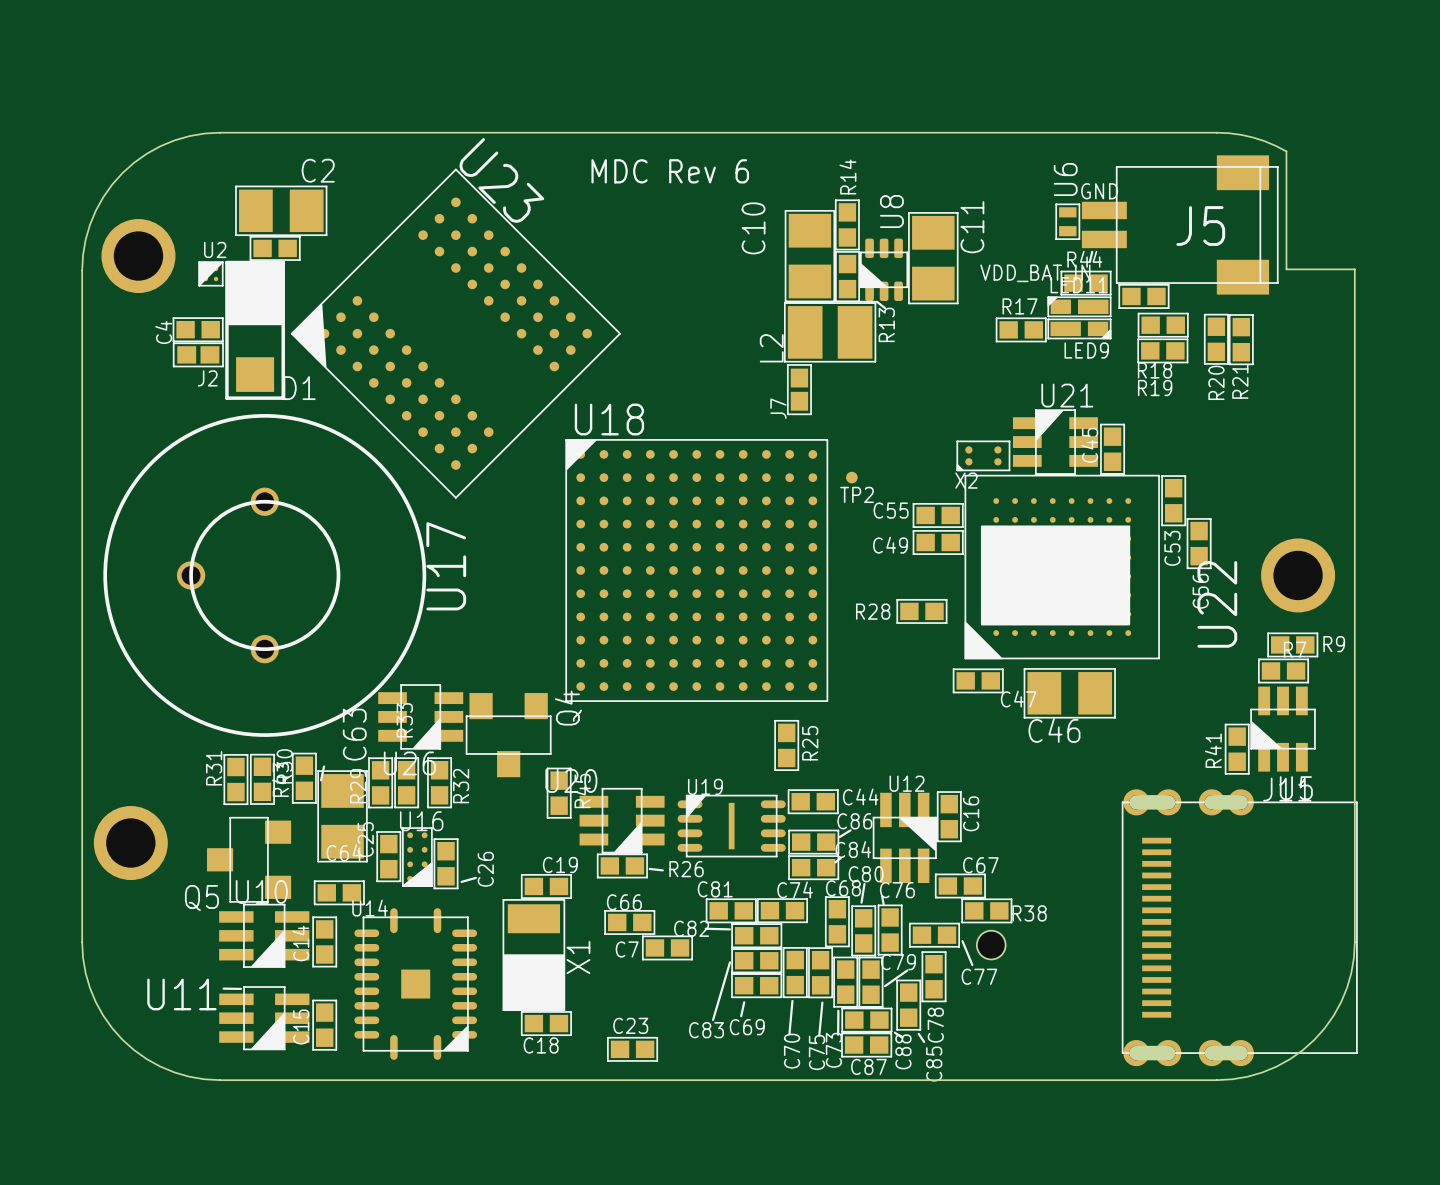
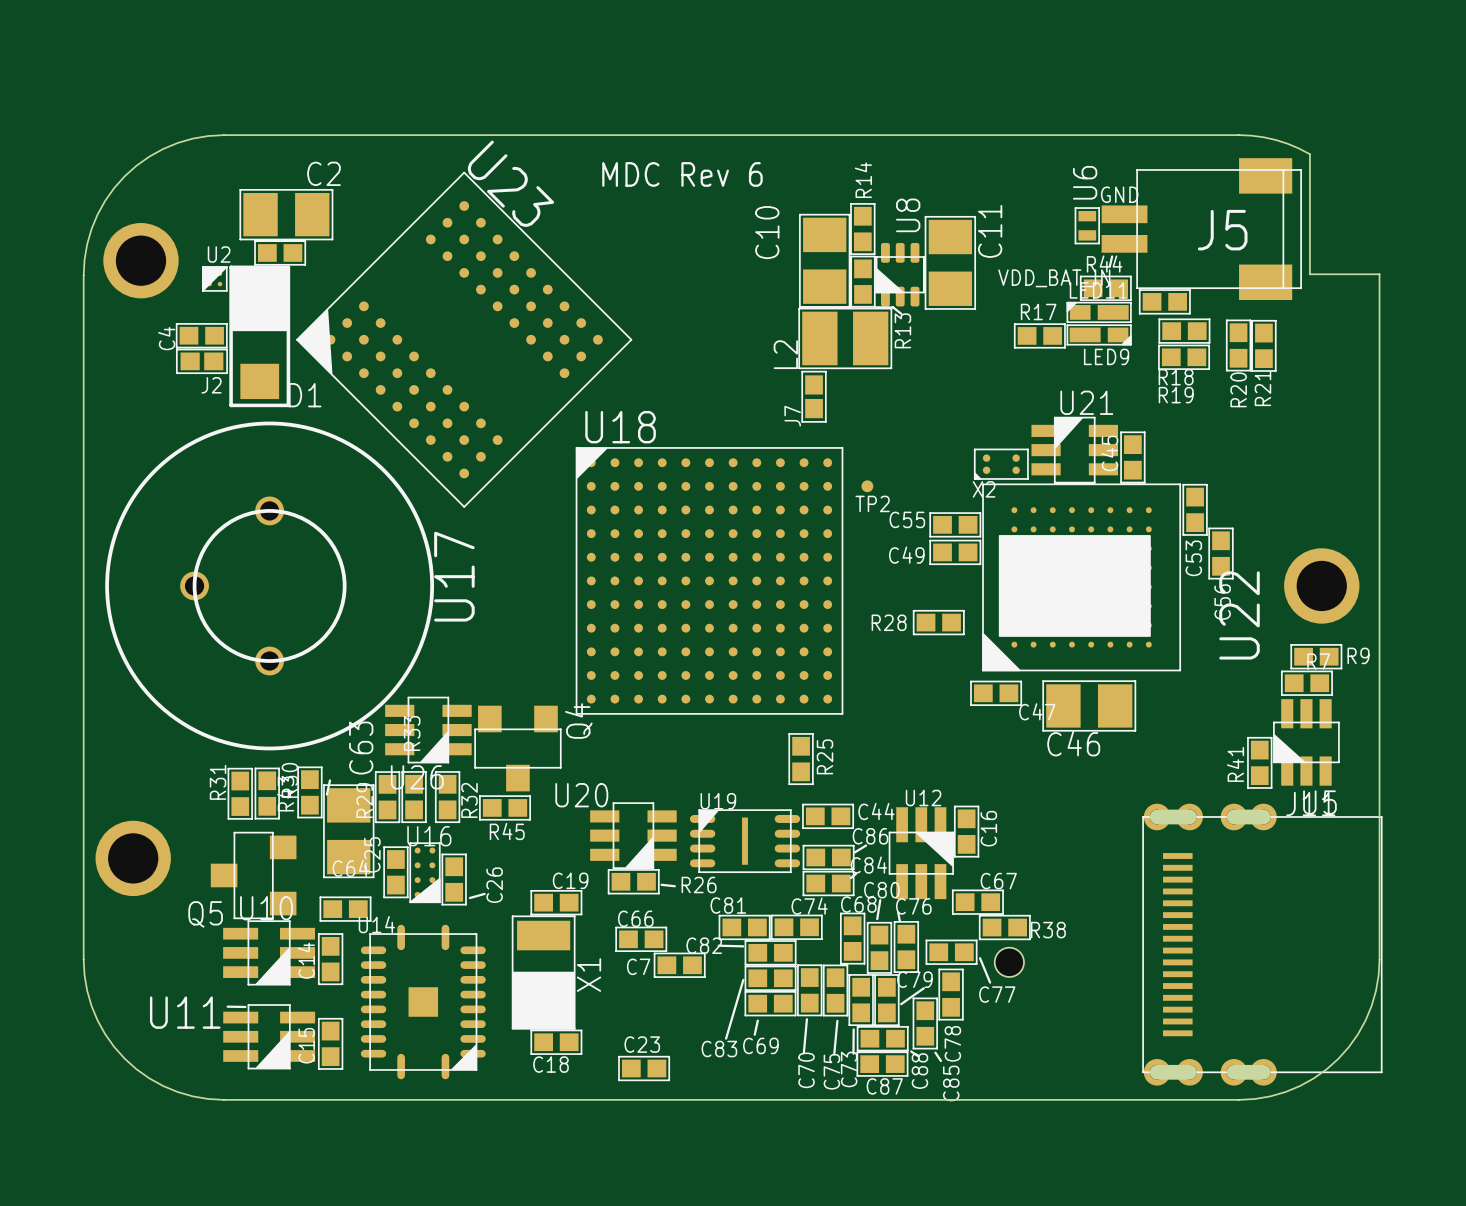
R45 rotation: 0° (559, 793) -> 90° clockwise (505, 807)
R45 position: (559, 793) -> (505, 807)

